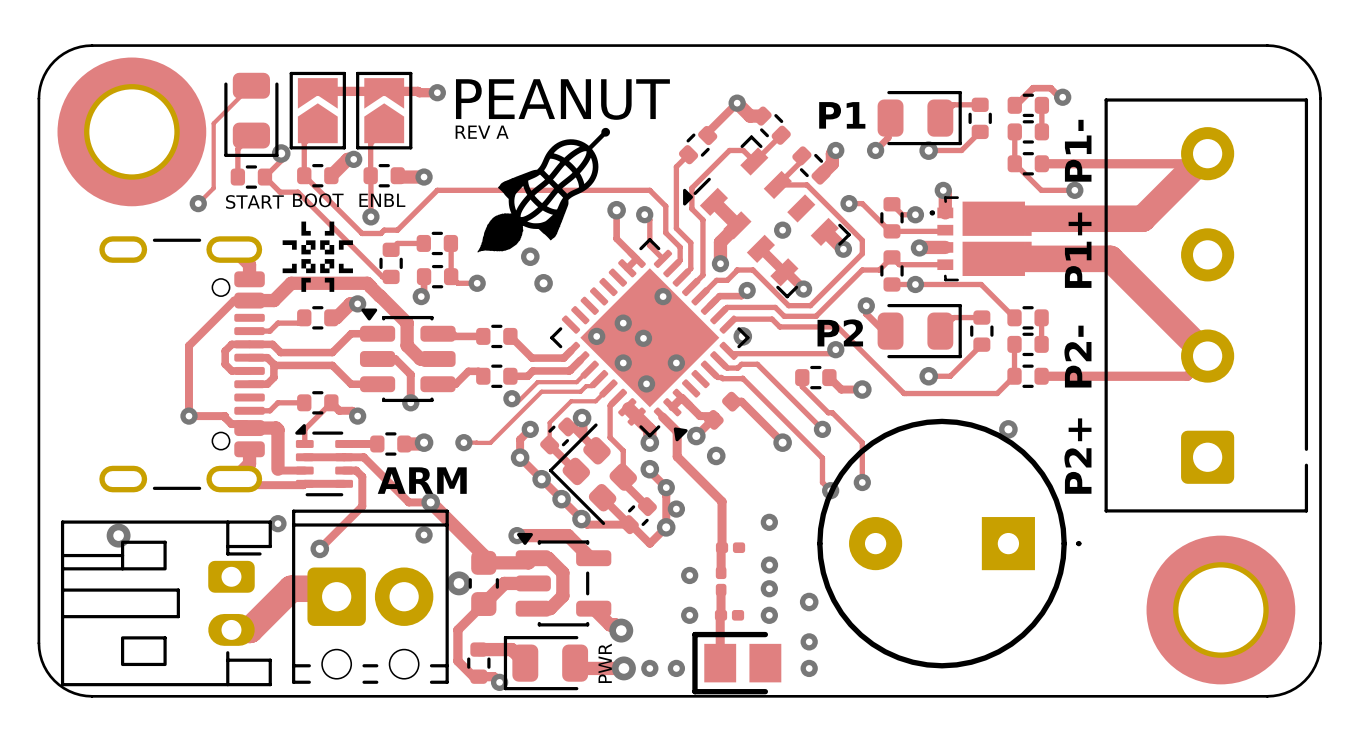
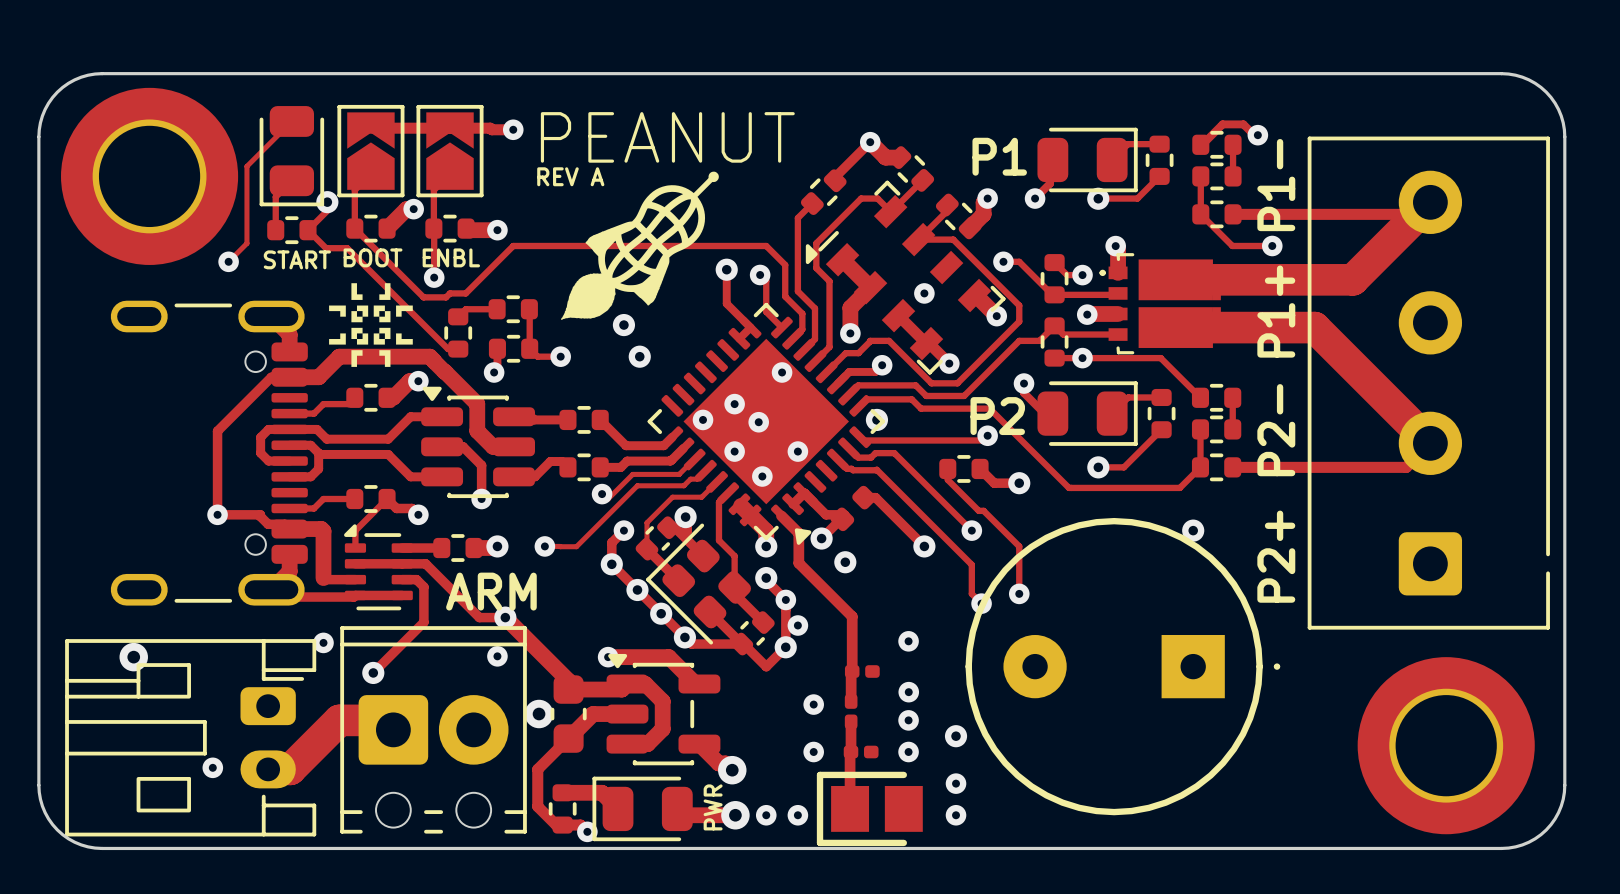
via: none -> (212, 767)

